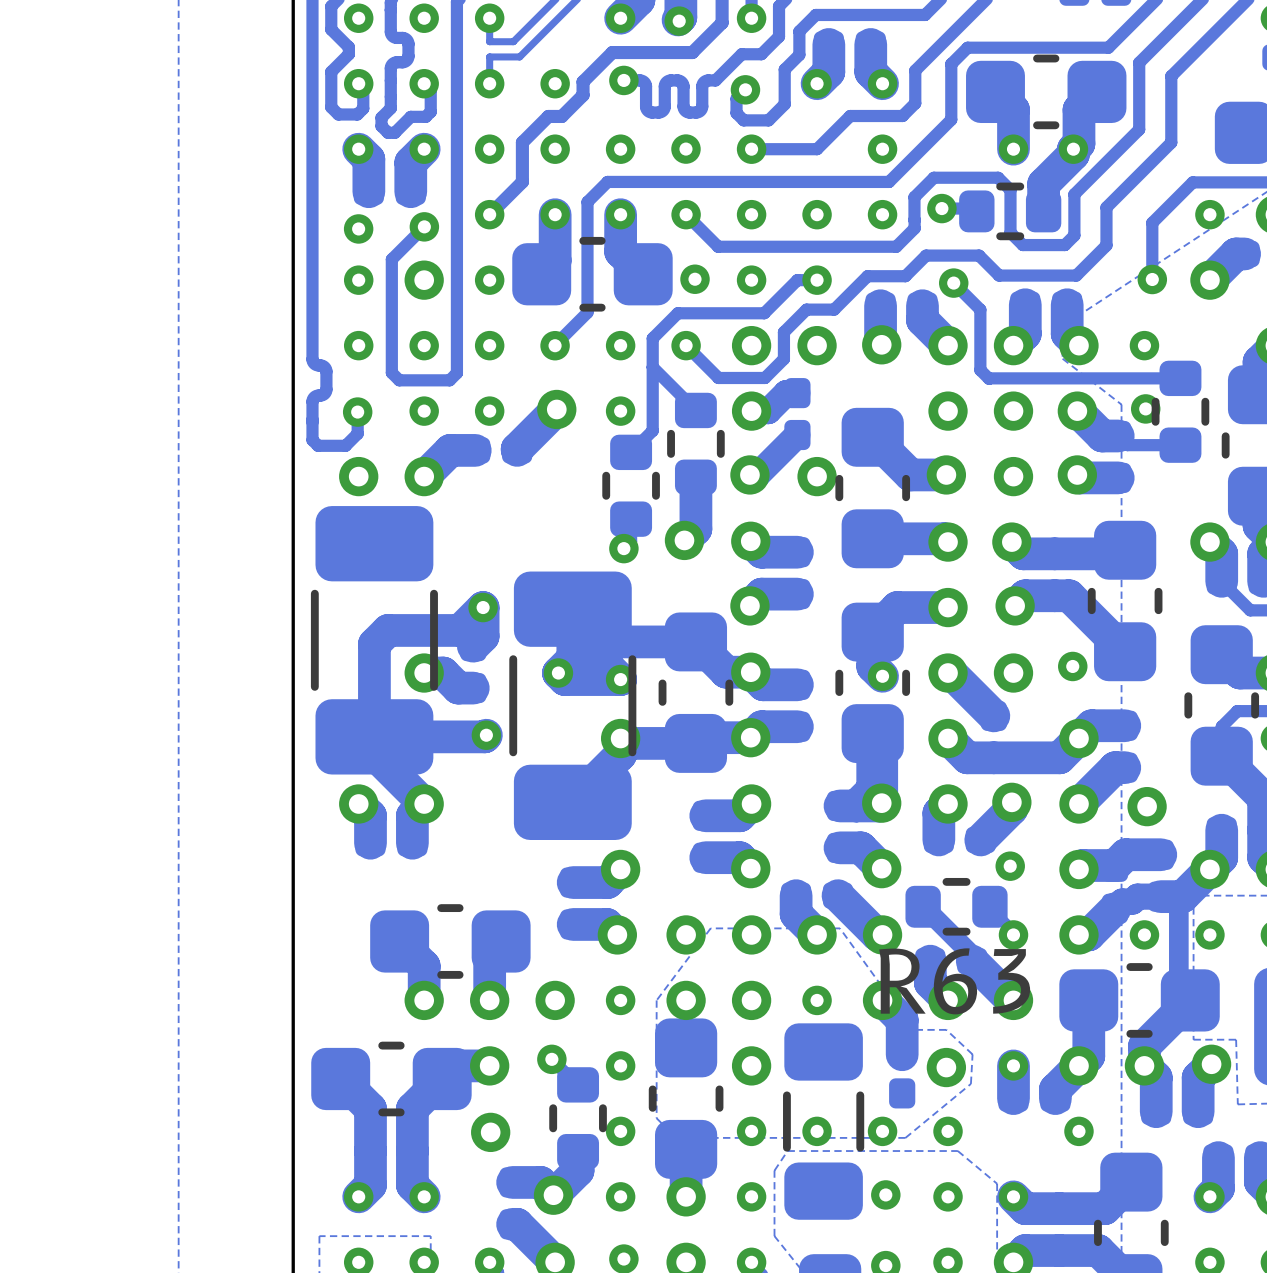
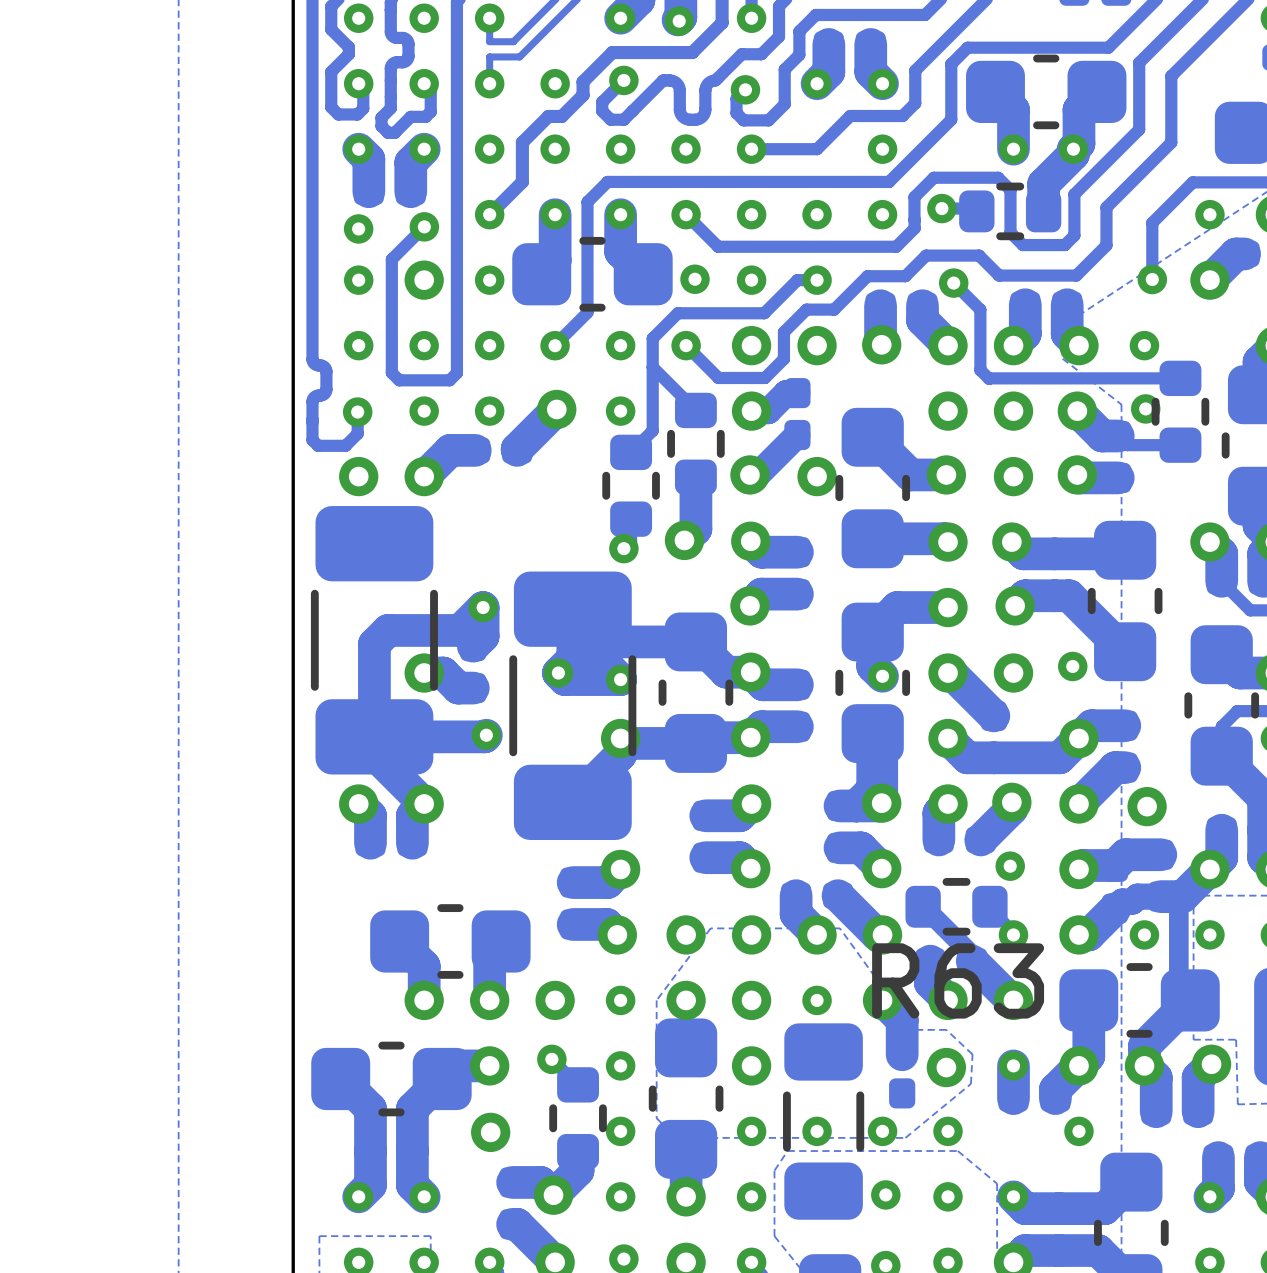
track: (715, 80) (707, 80) (703, 83) (702, 107) (696, 112) (688, 112) (684, 109) (683, 85) (680, 81) (670, 80) (666, 82) (664, 109) (660, 112) (652, 112) (646, 107) (644, 82) (640, 80) (623, 80) -> (715, 80) (710, 82) (706, 86) (705, 111) (698, 119) (688, 119) (682, 116) (679, 110) (678, 86) (672, 81) (663, 80) (623, 119) (610, 119) (602, 111) (602, 102) (623, 80)

